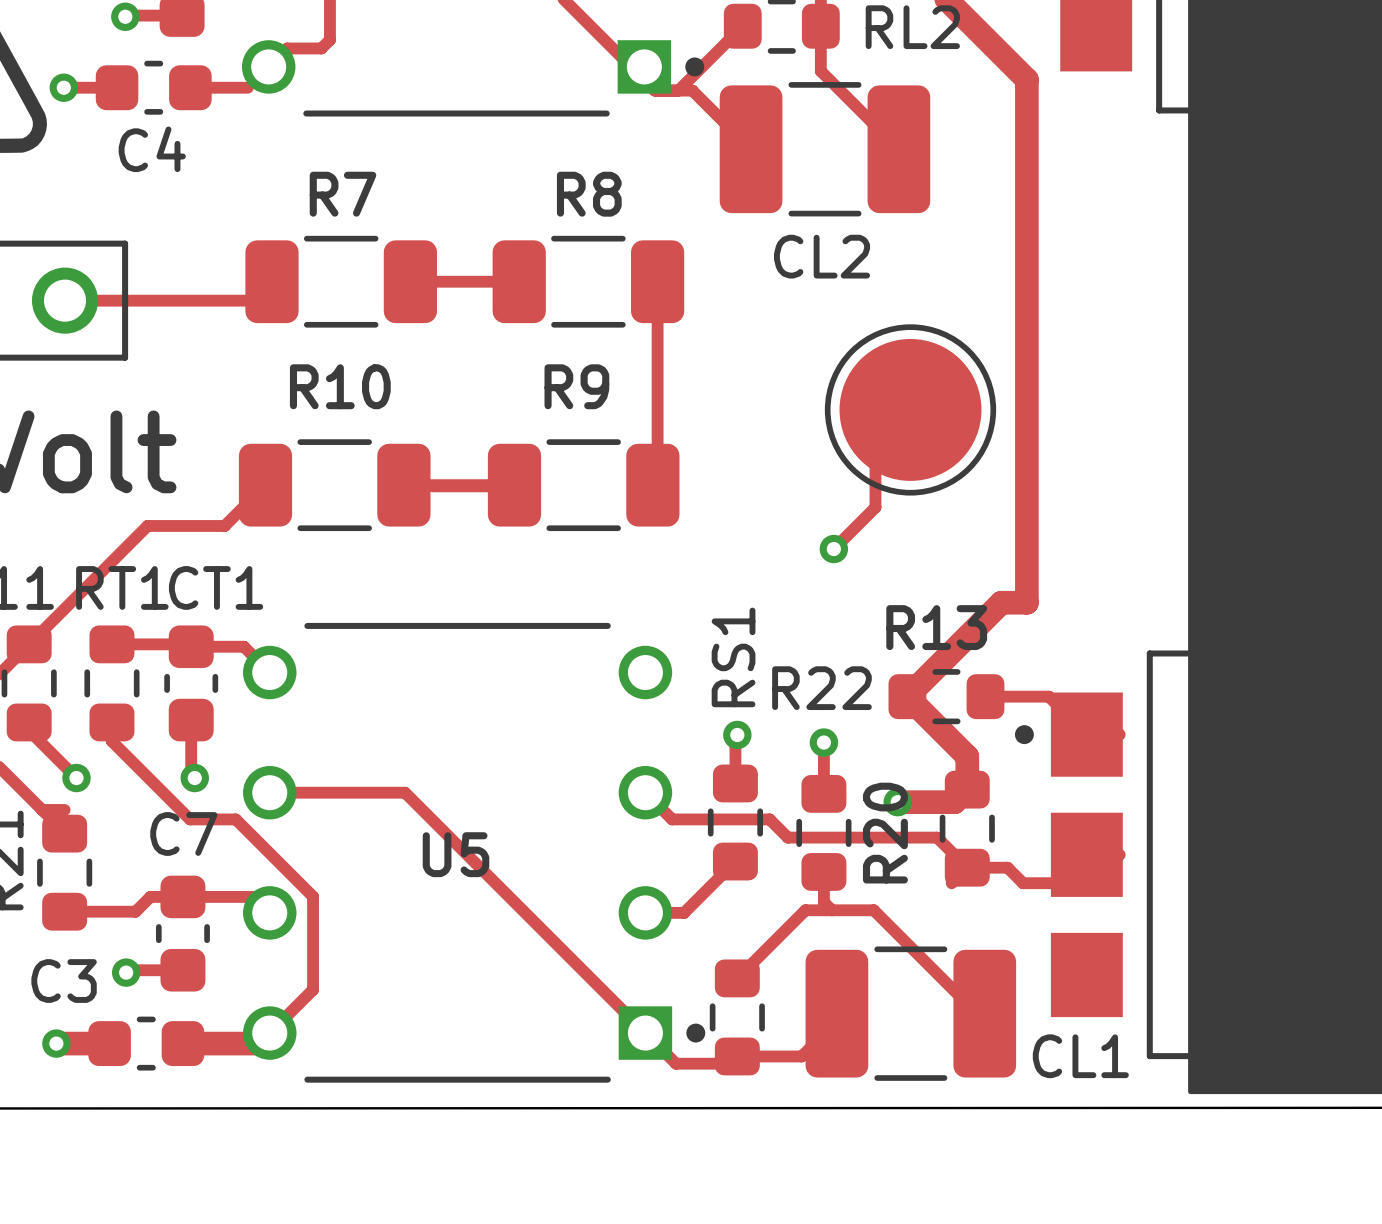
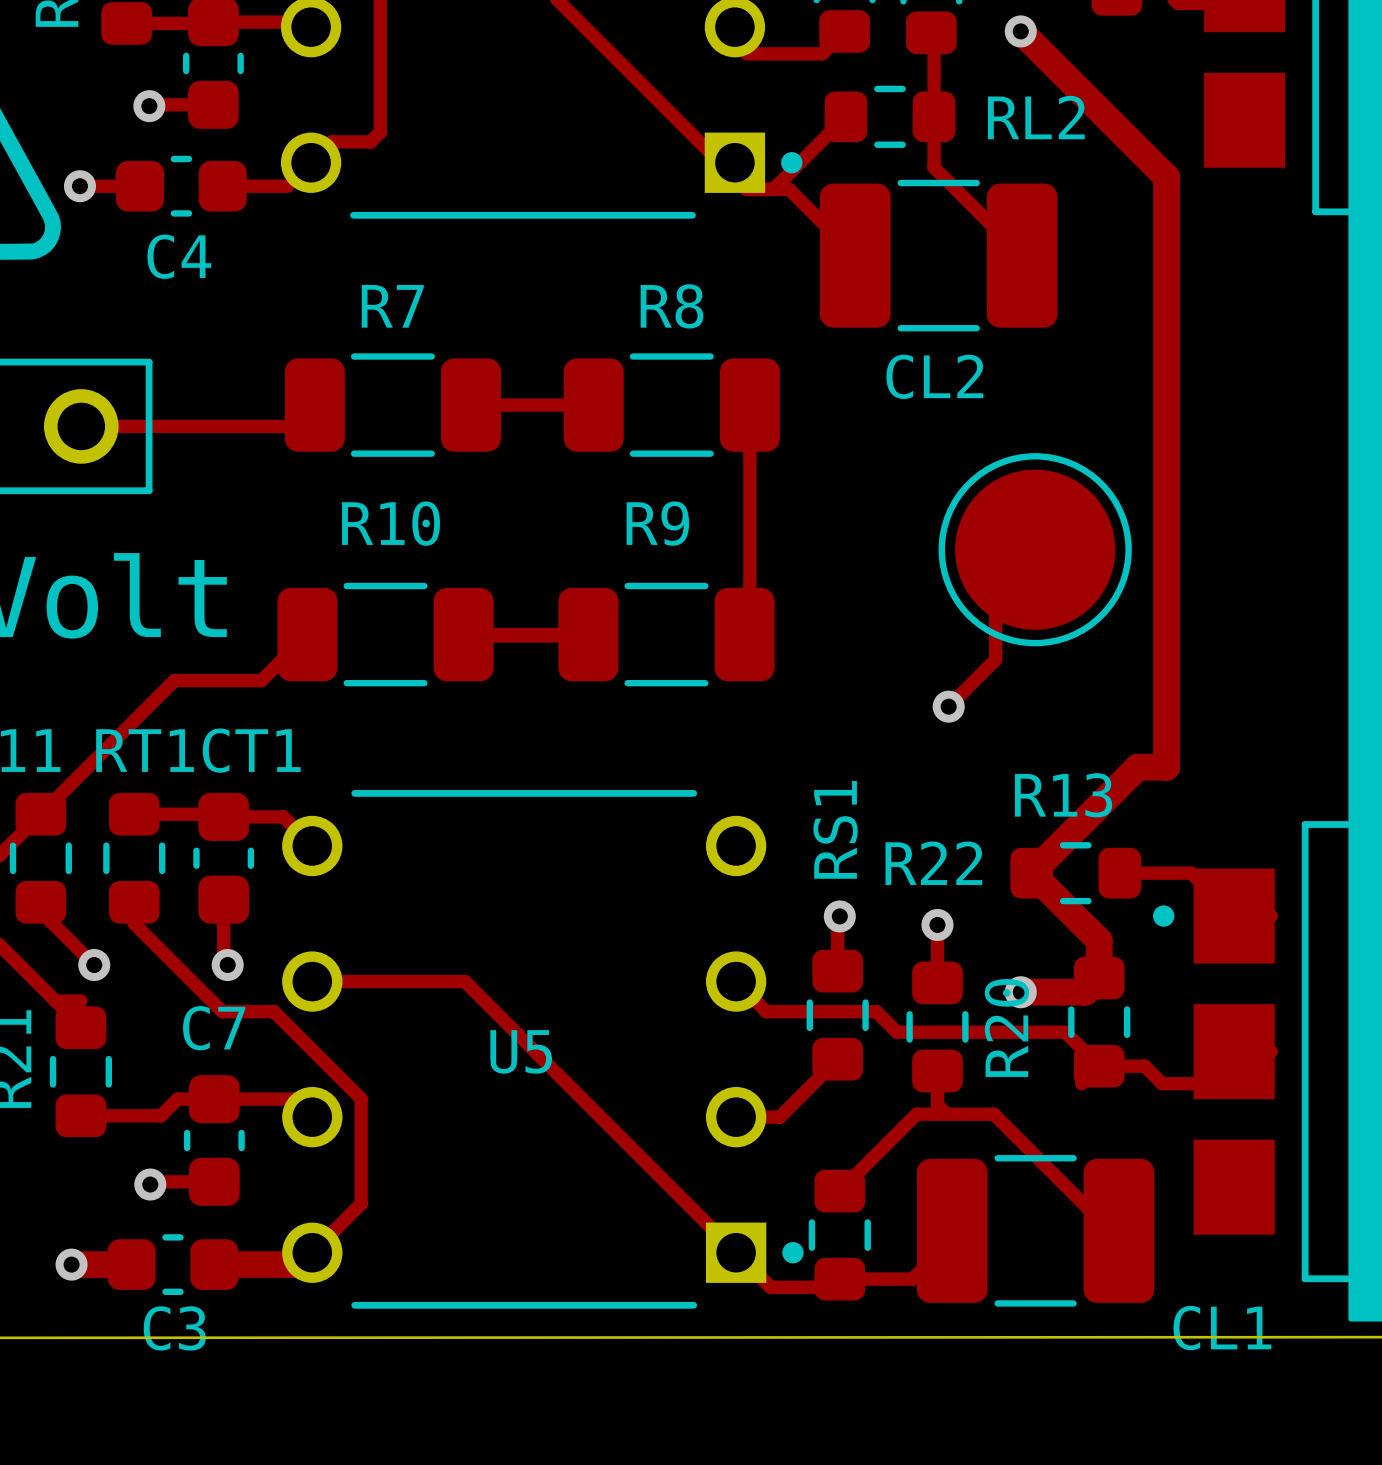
C3 name position: C3 (64, 981) -> C3 (174, 1328)
CL1 name position: CL1 (1080, 1056) -> CL1 (1222, 1328)

